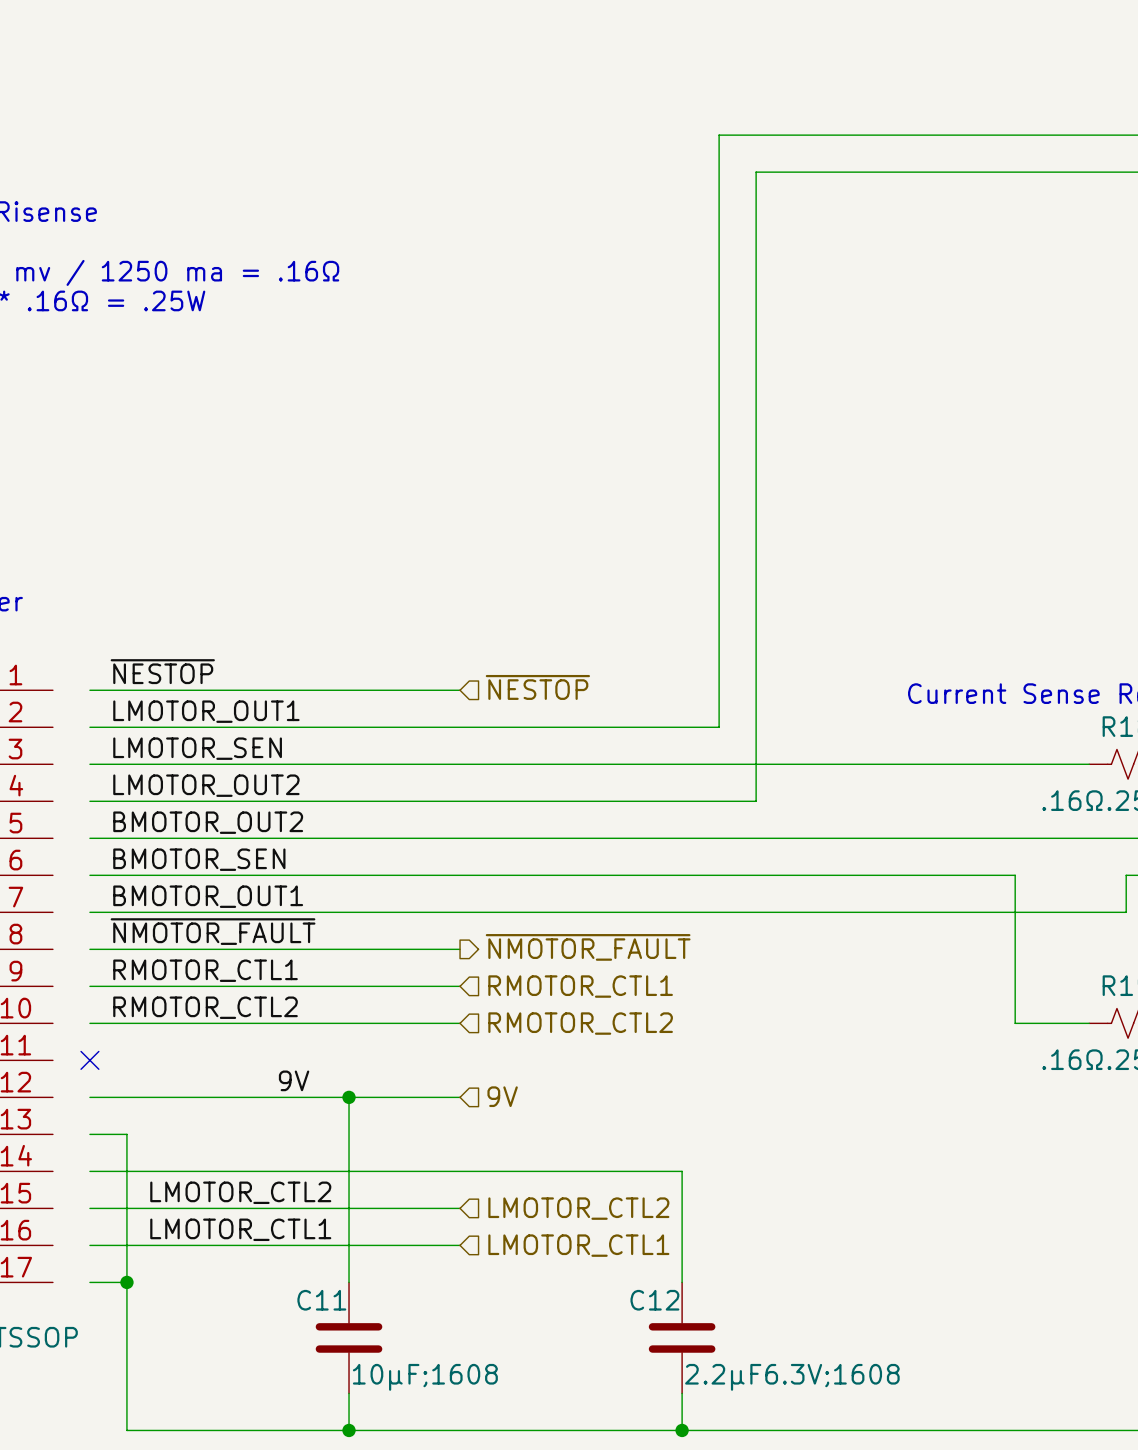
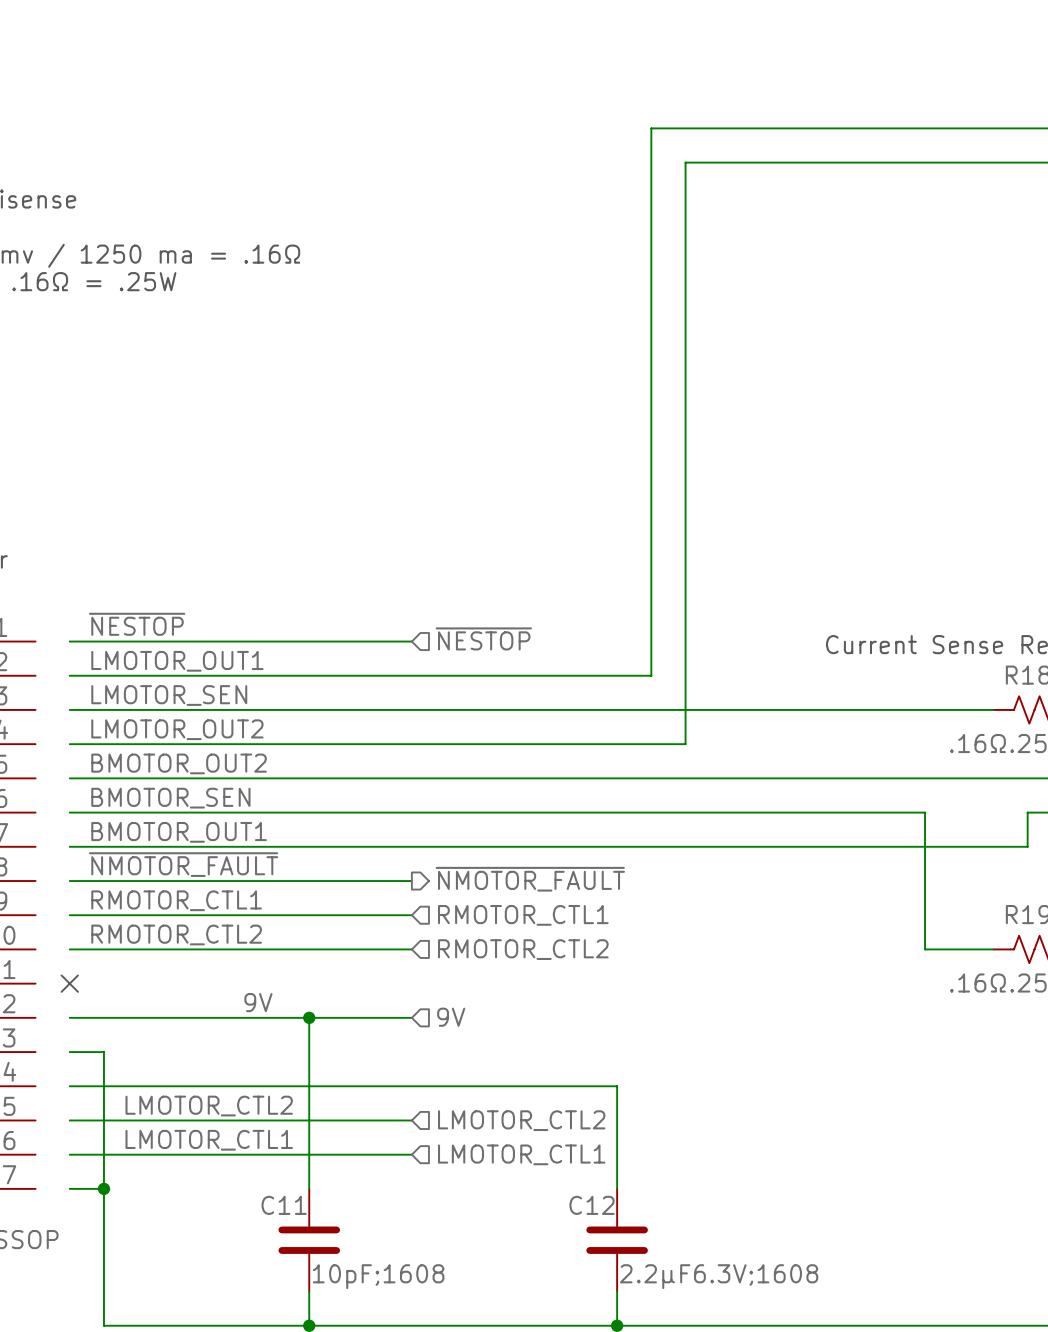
C11 value: 10µF;1608 (425, 1377) -> 10pF;1608 (378, 1276)

